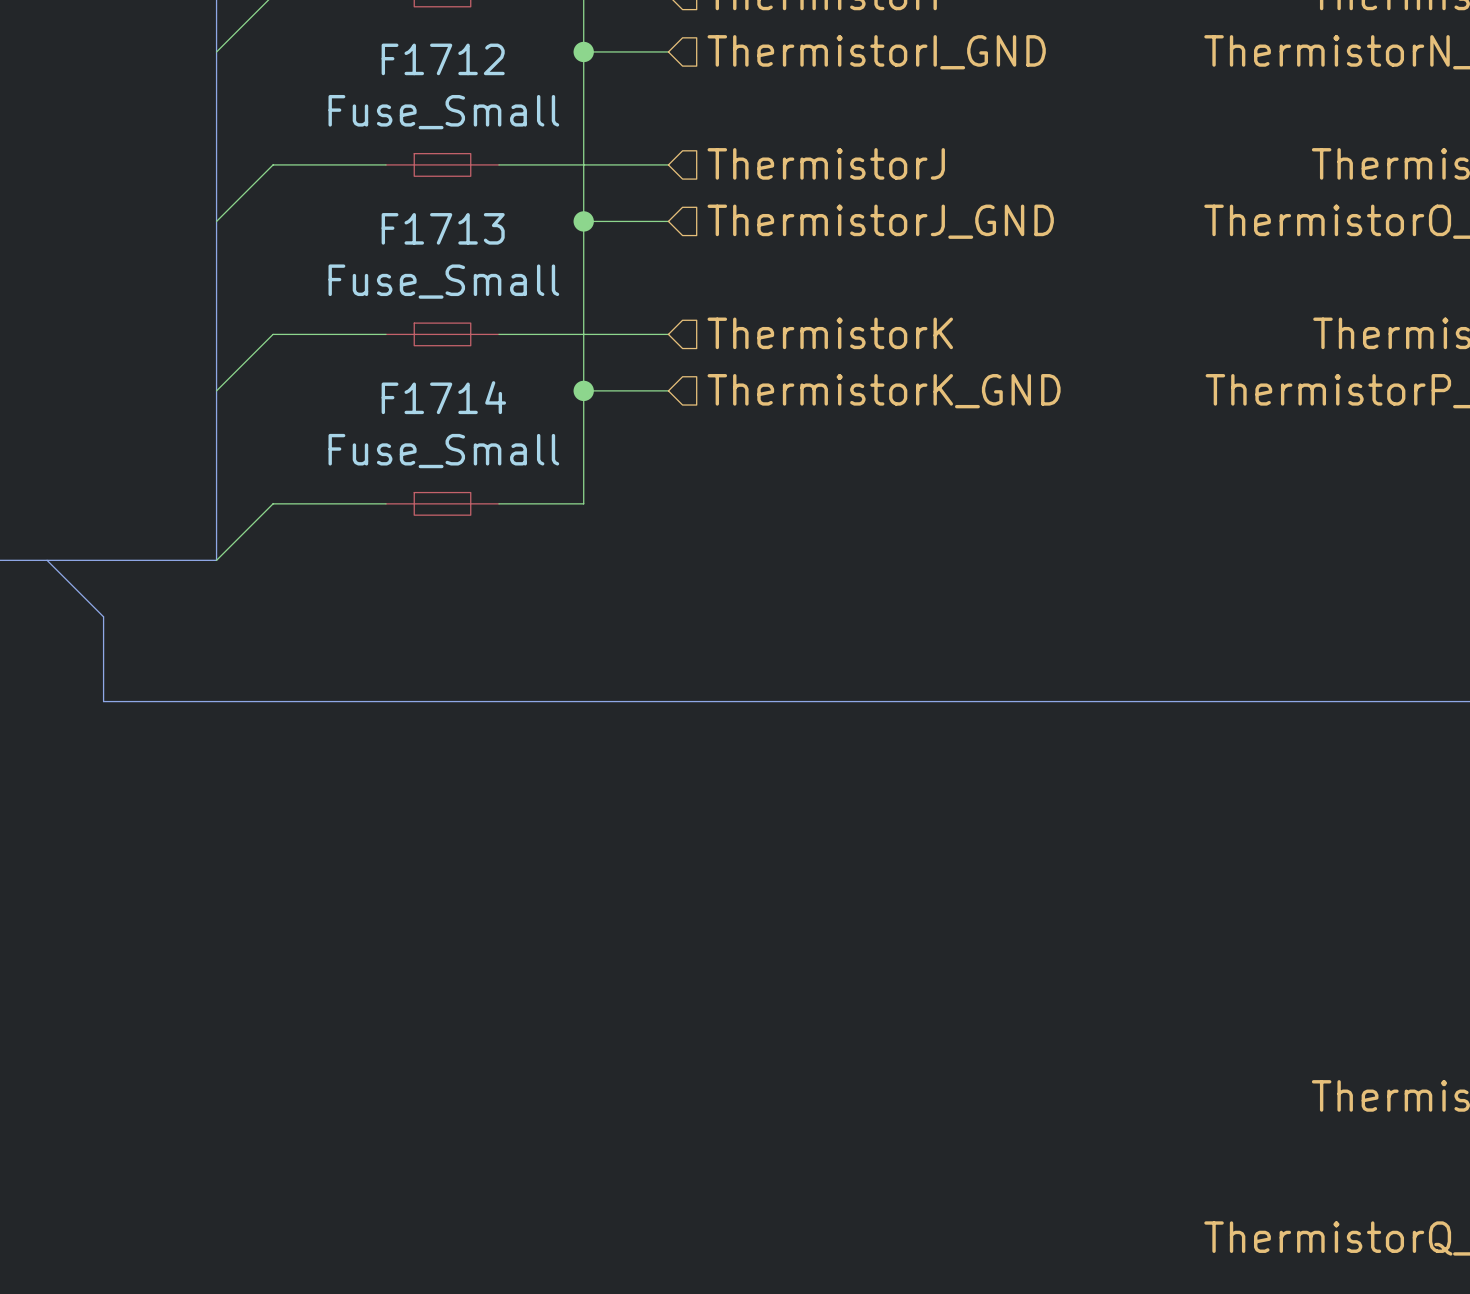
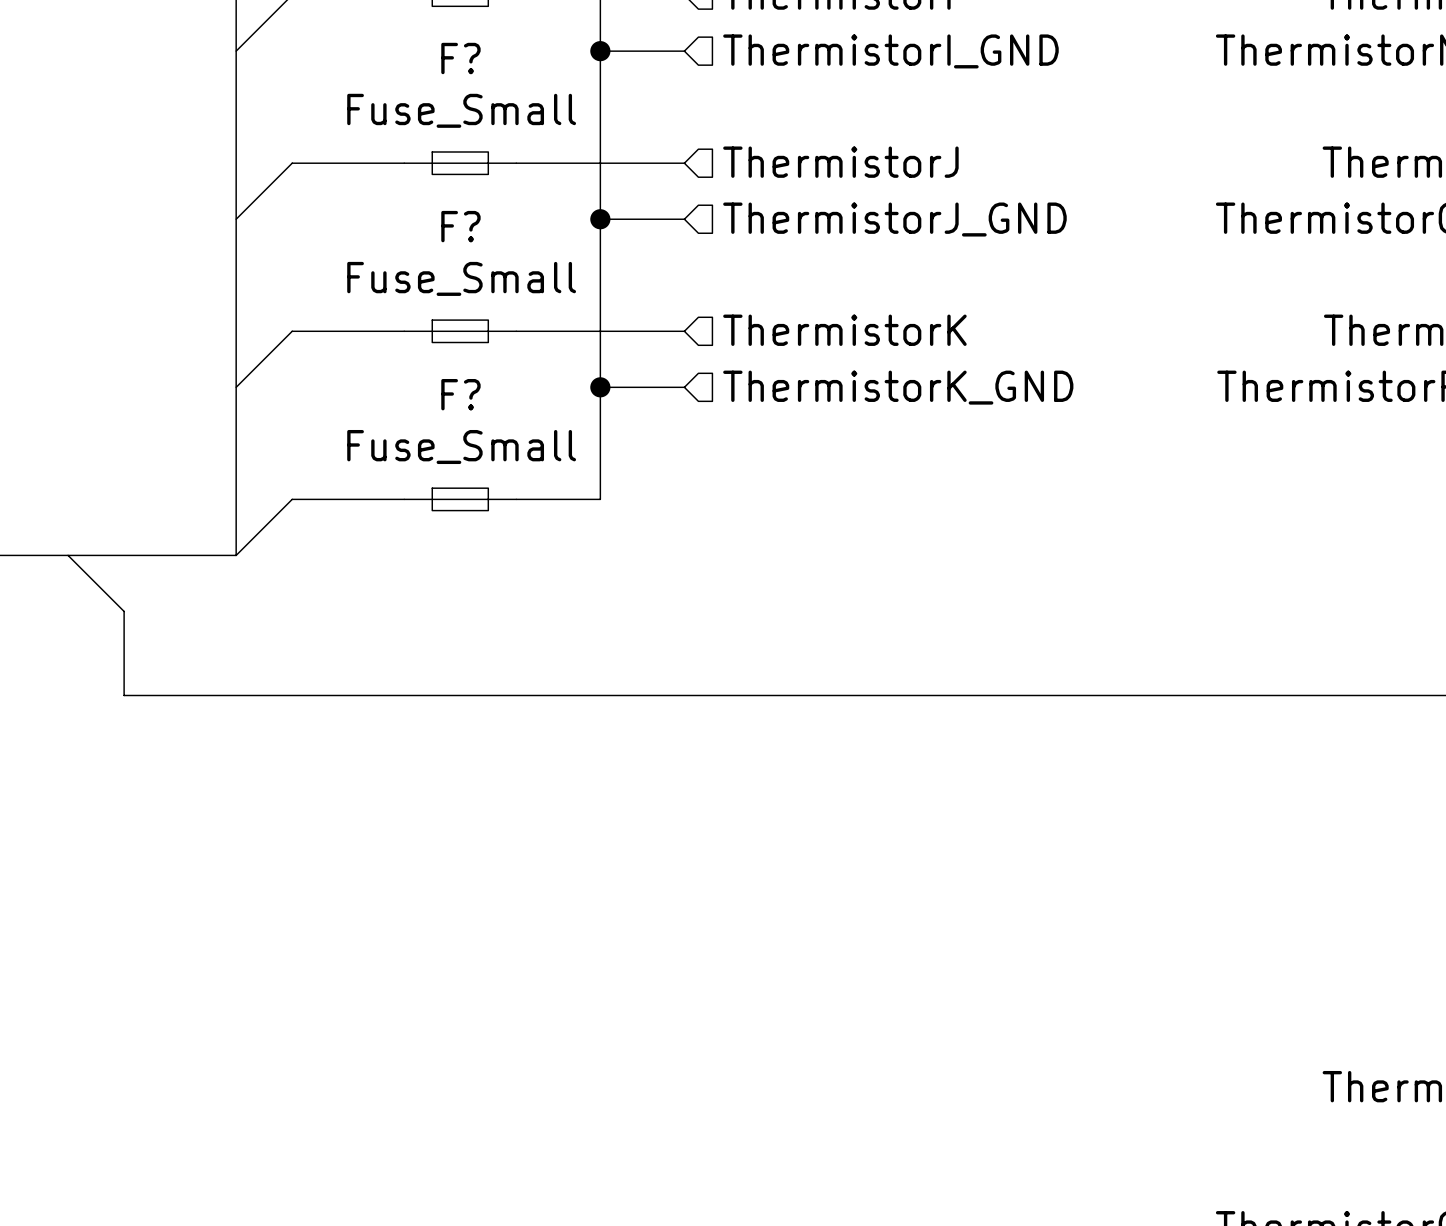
F1712 name: F1712 (443, 59) -> F? (460, 58)
F1713 name: F1713 (443, 228) -> F? (460, 226)
F1714 name: F1714 (443, 397) -> F? (460, 394)

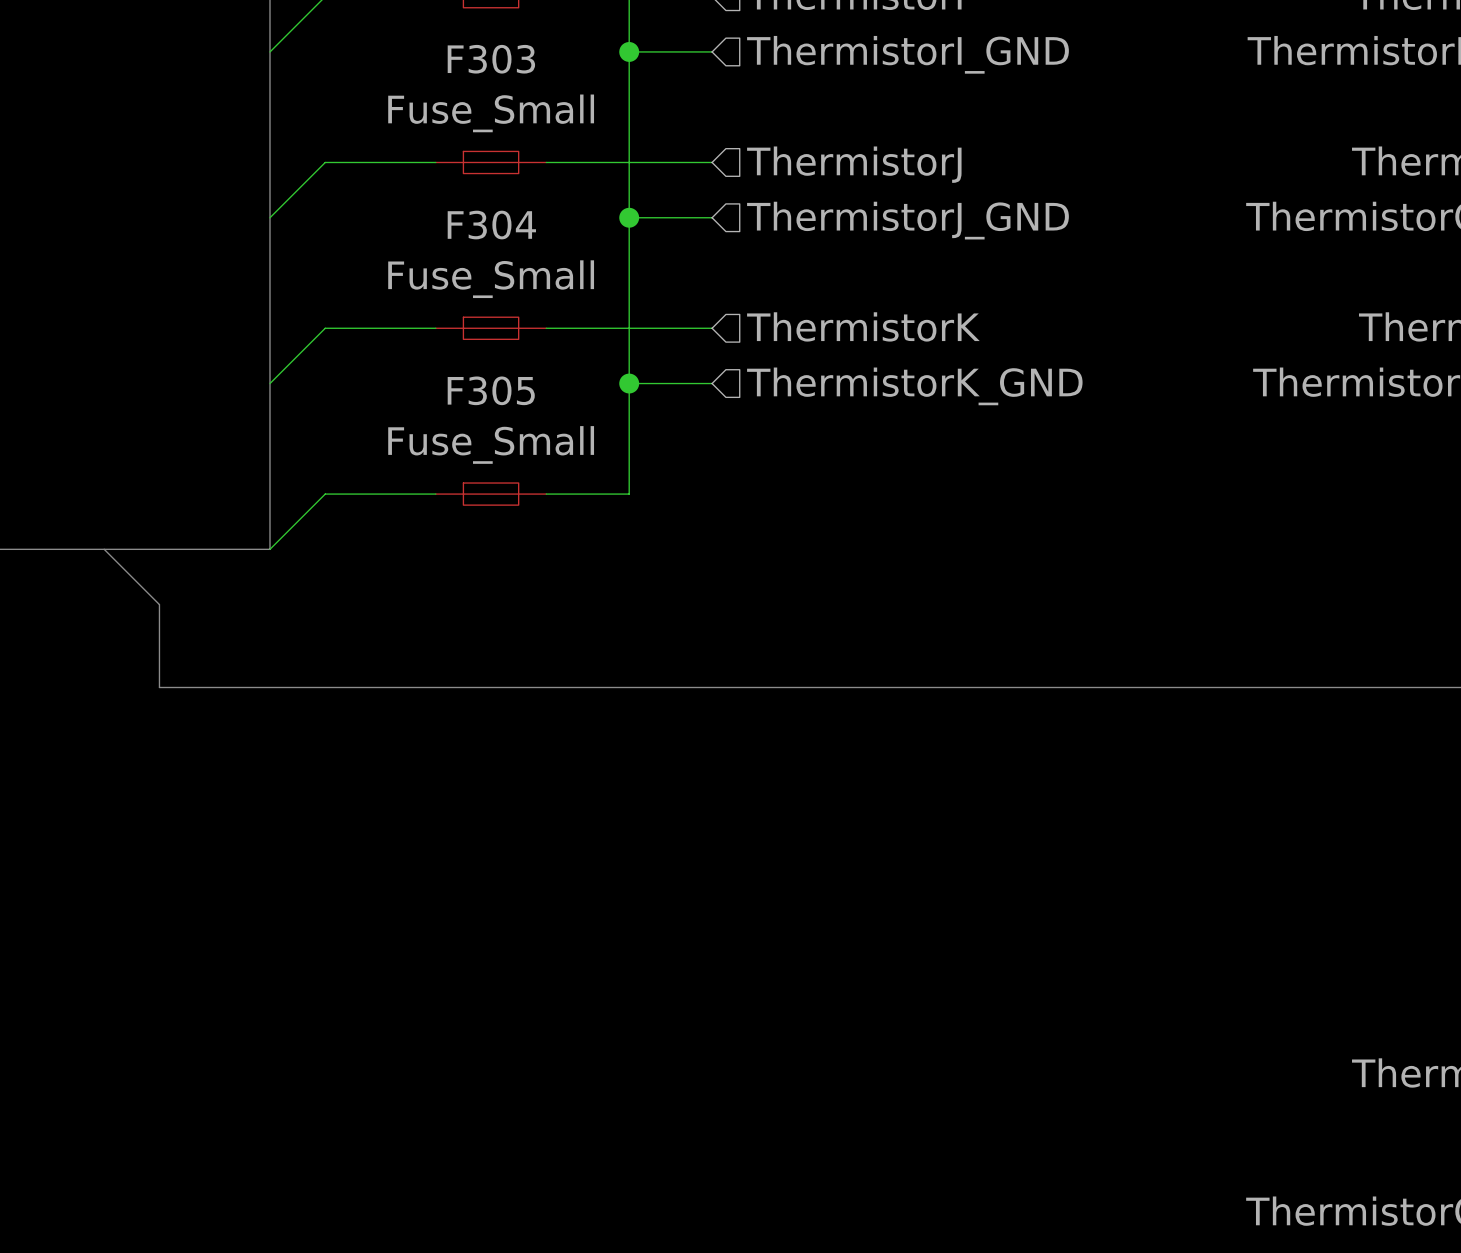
F? name: F? (460, 58) -> F303 (491, 59)
F? name: F? (460, 226) -> F304 (491, 225)
F? name: F? (460, 394) -> F305 (491, 390)

